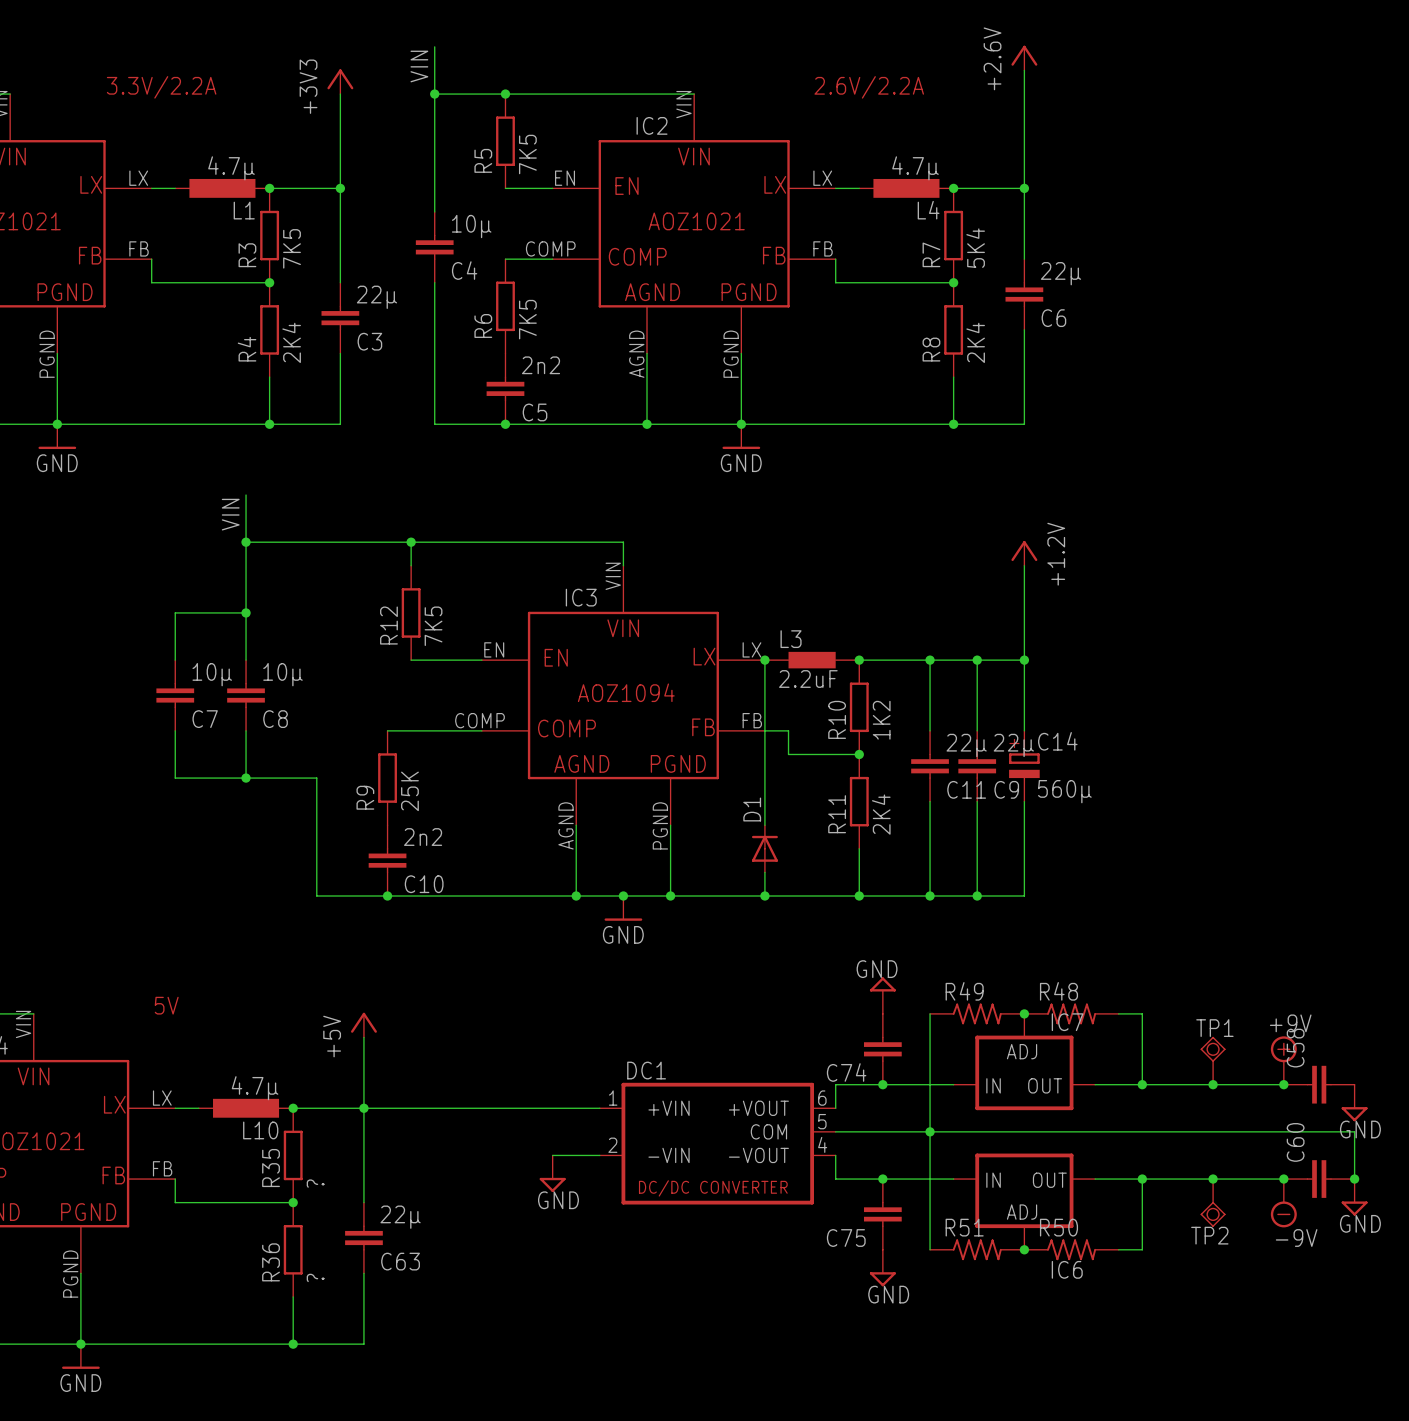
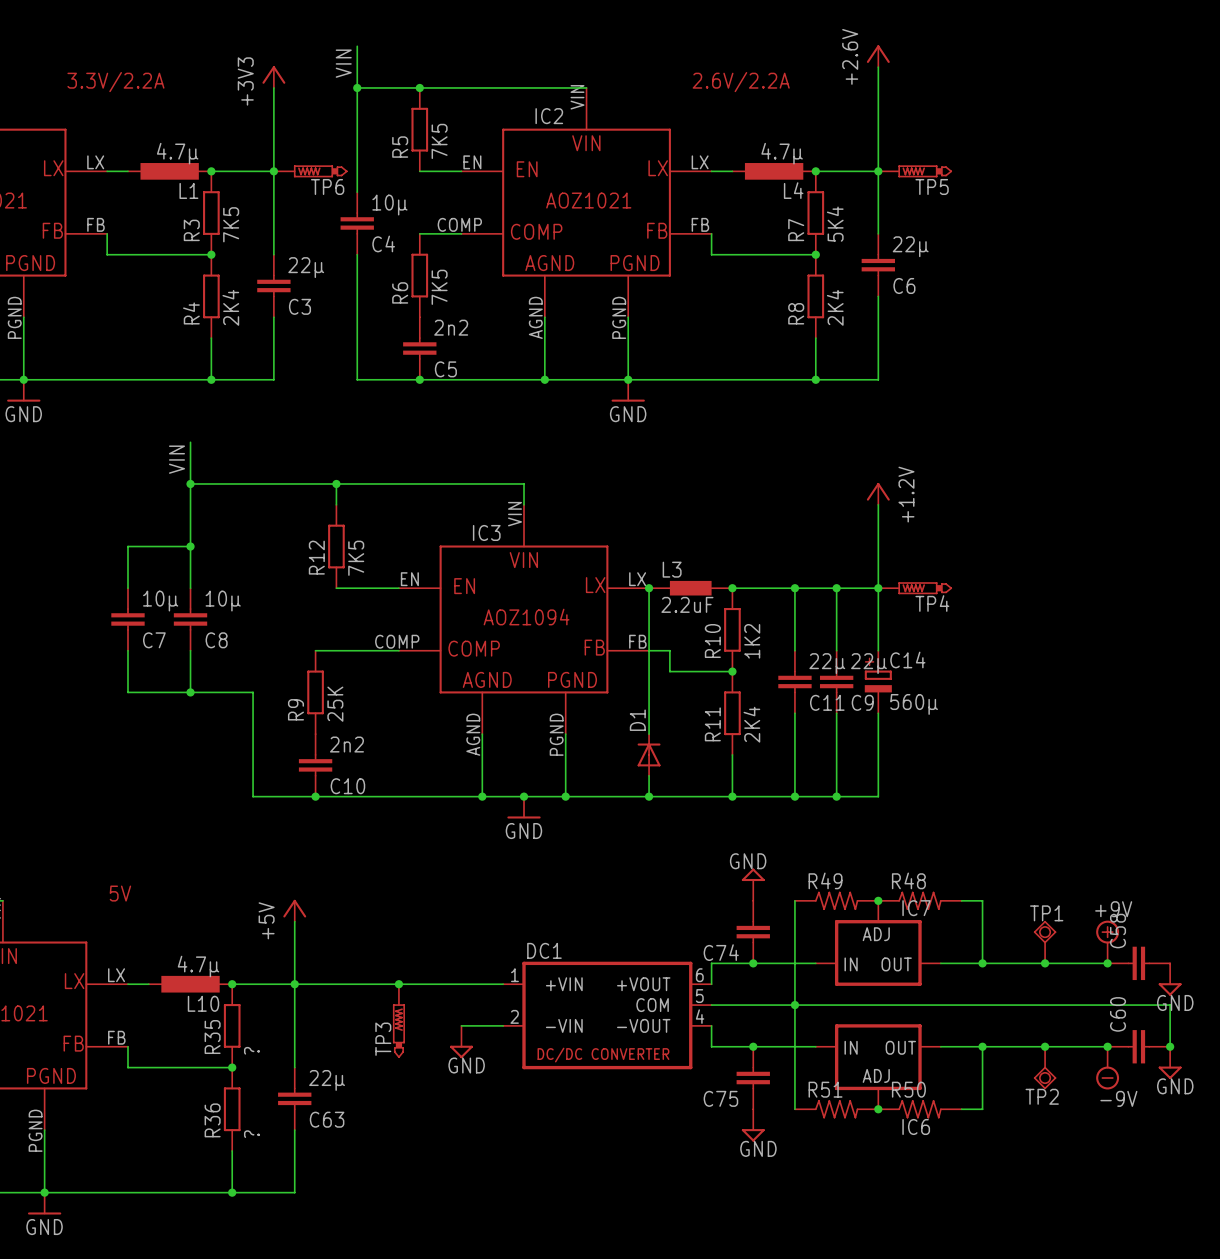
TP6: none -> (310, 171)
TP5: none -> (915, 171)
TP4: none -> (915, 588)
junction: none -> (398, 984)
TP3: none -> (398, 1021)

